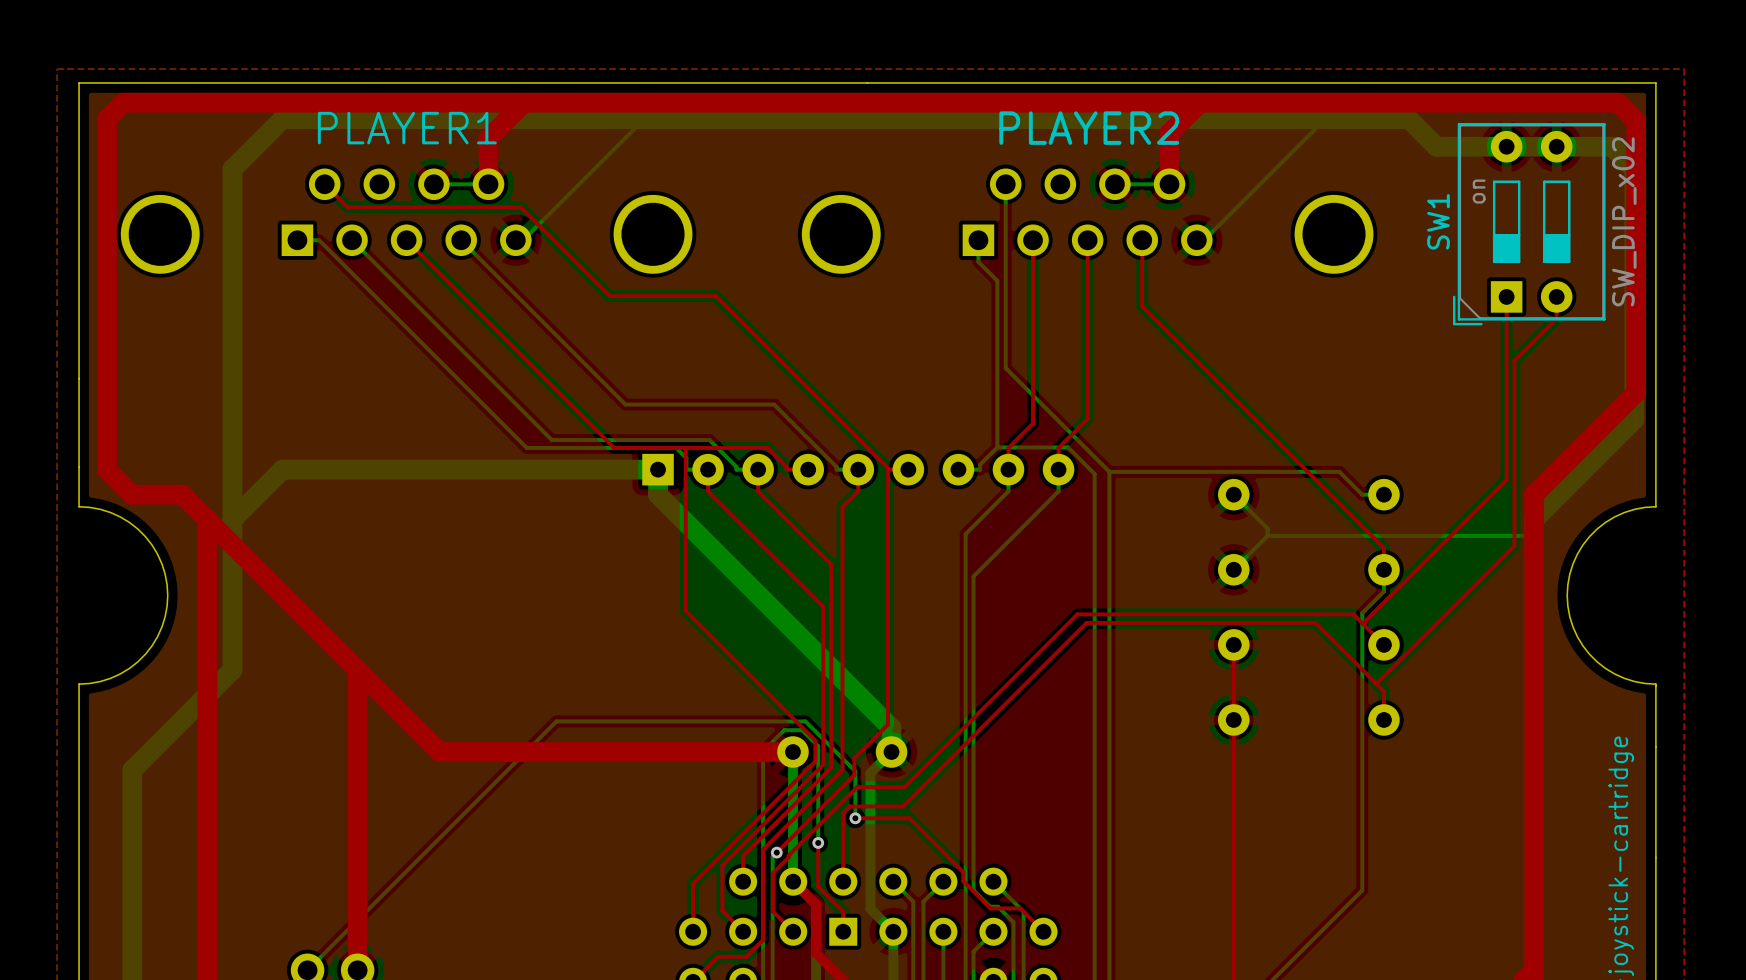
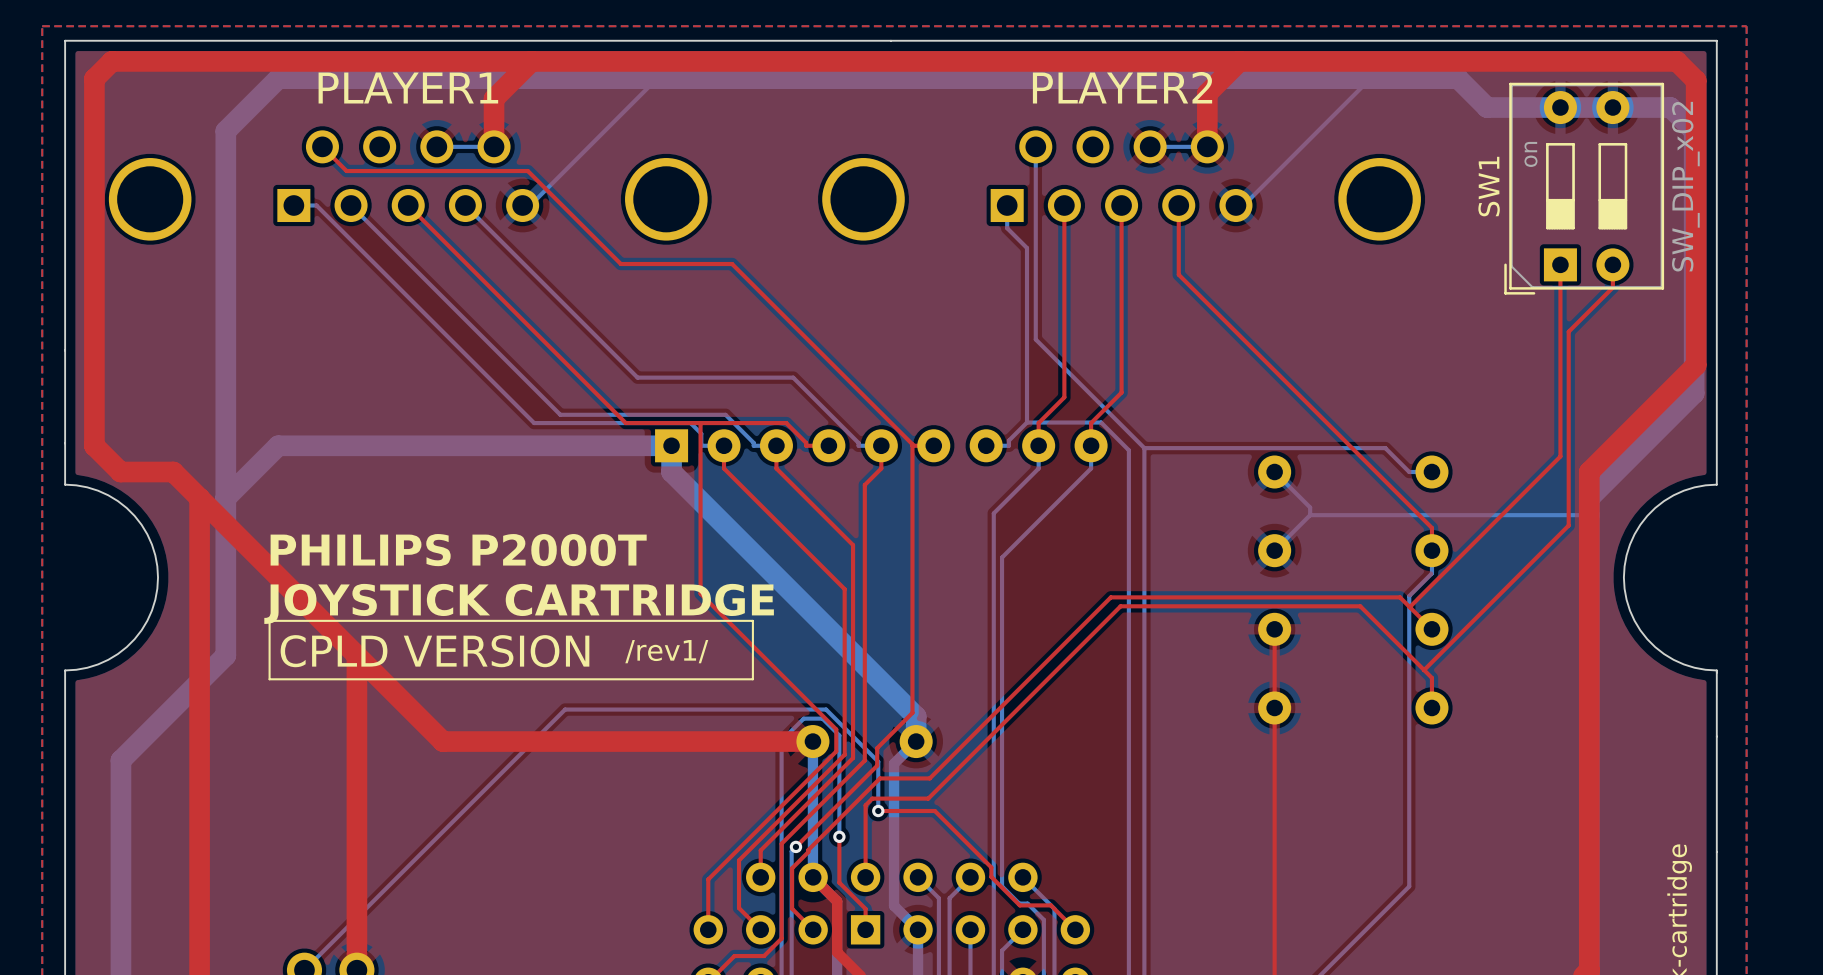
text: none -> PHILIPS P2000T (458, 550)
text: none -> JOYSTICK CARTRIDGE (519, 603)
line: none -> (269, 620) (752, 620) (752, 679) (269, 679) (269, 620)
text: none -> CPLD VERSION (435, 651)
text: none -> /rev1/ (666, 651)

